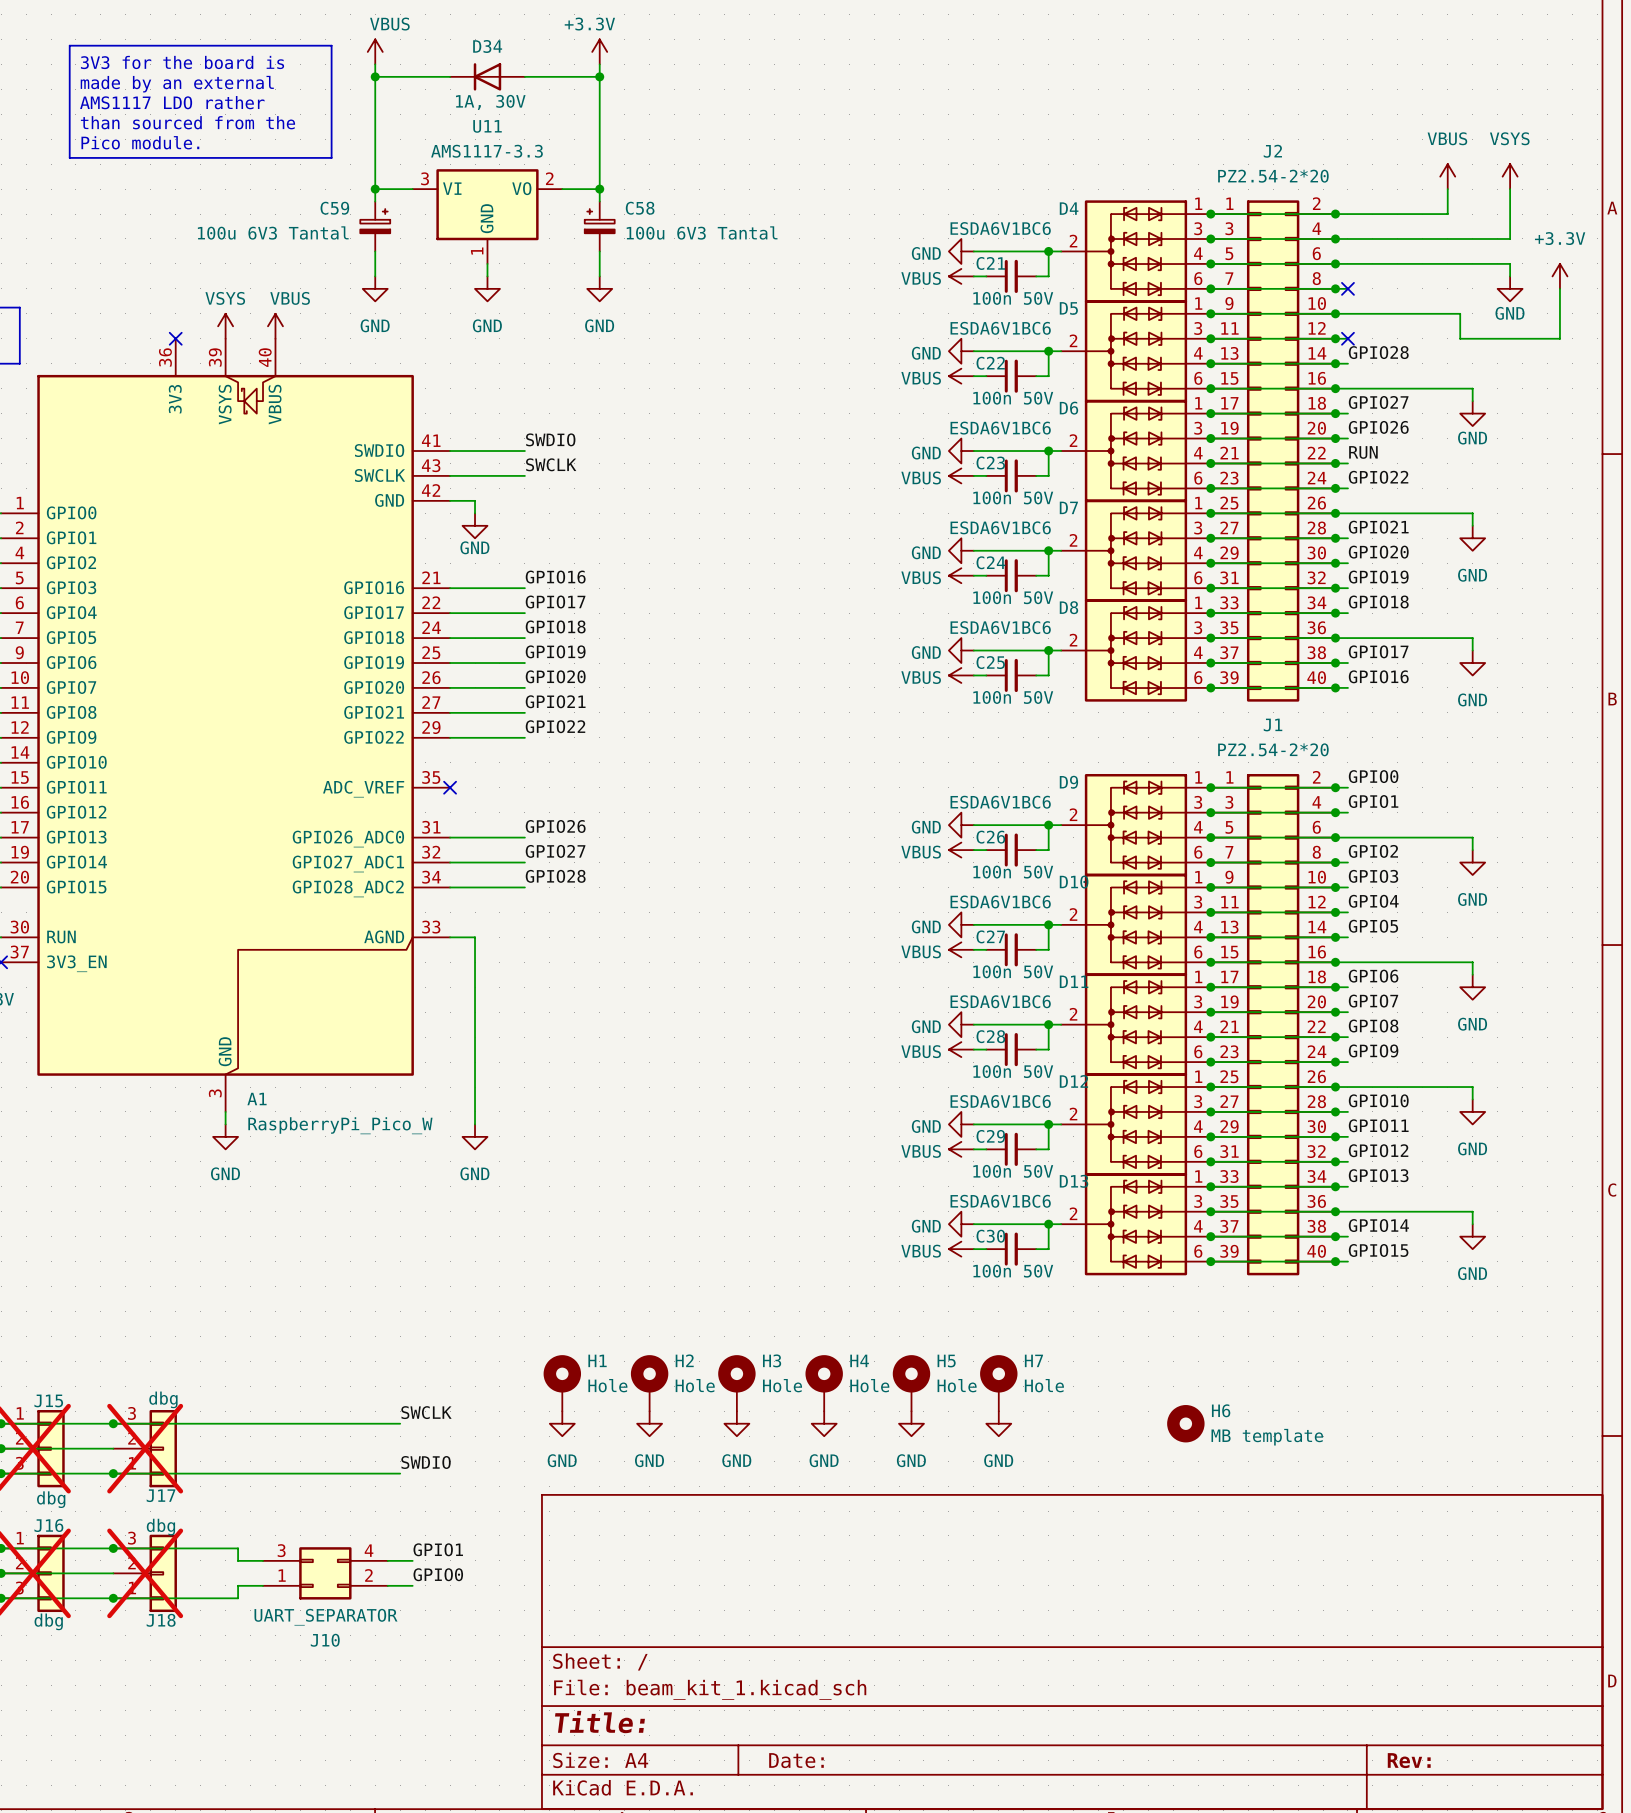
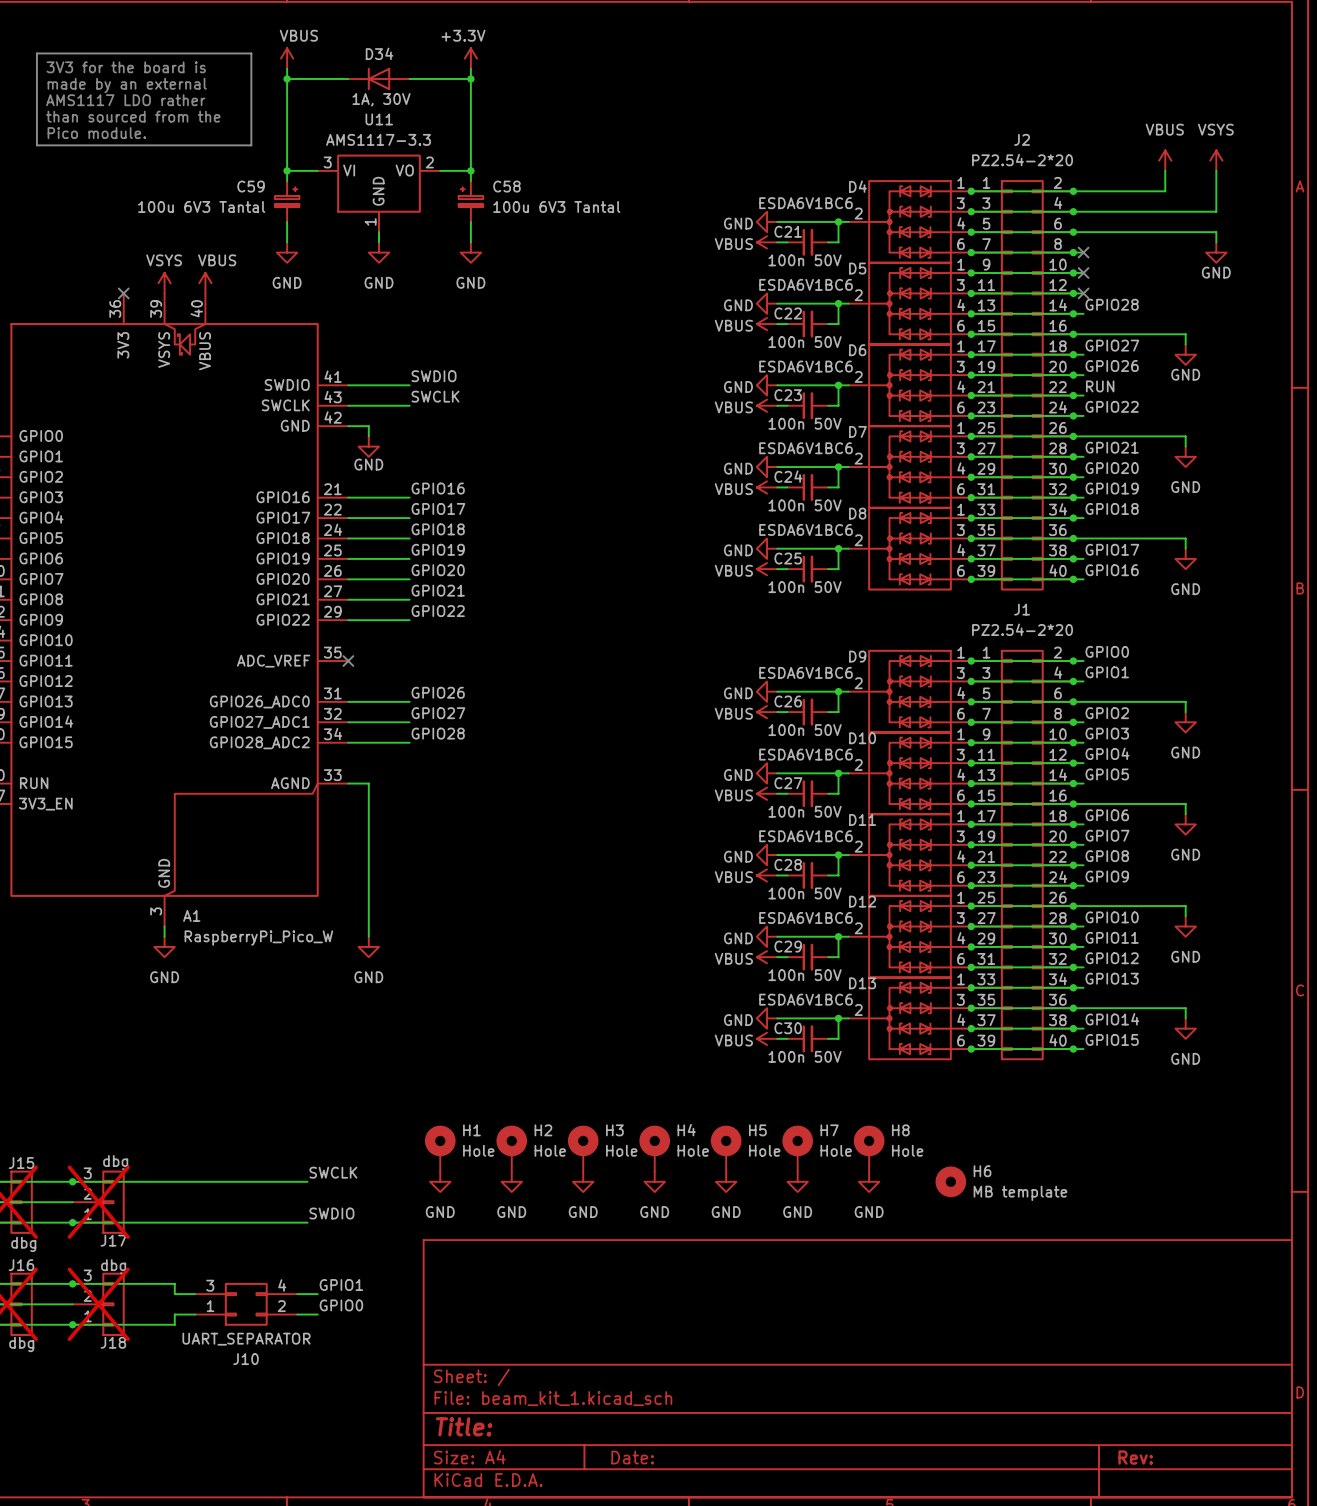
power symbol: +3.3V (1559, 276) -> none
wire: (1559, 288) (1559, 338) (1460, 338) (1460, 313) (1347, 313) -> none
no-connect mark: none -> (1083, 273)
H8: none -> Hole (869, 1148)
power symbol: none -> GND (869, 1181)

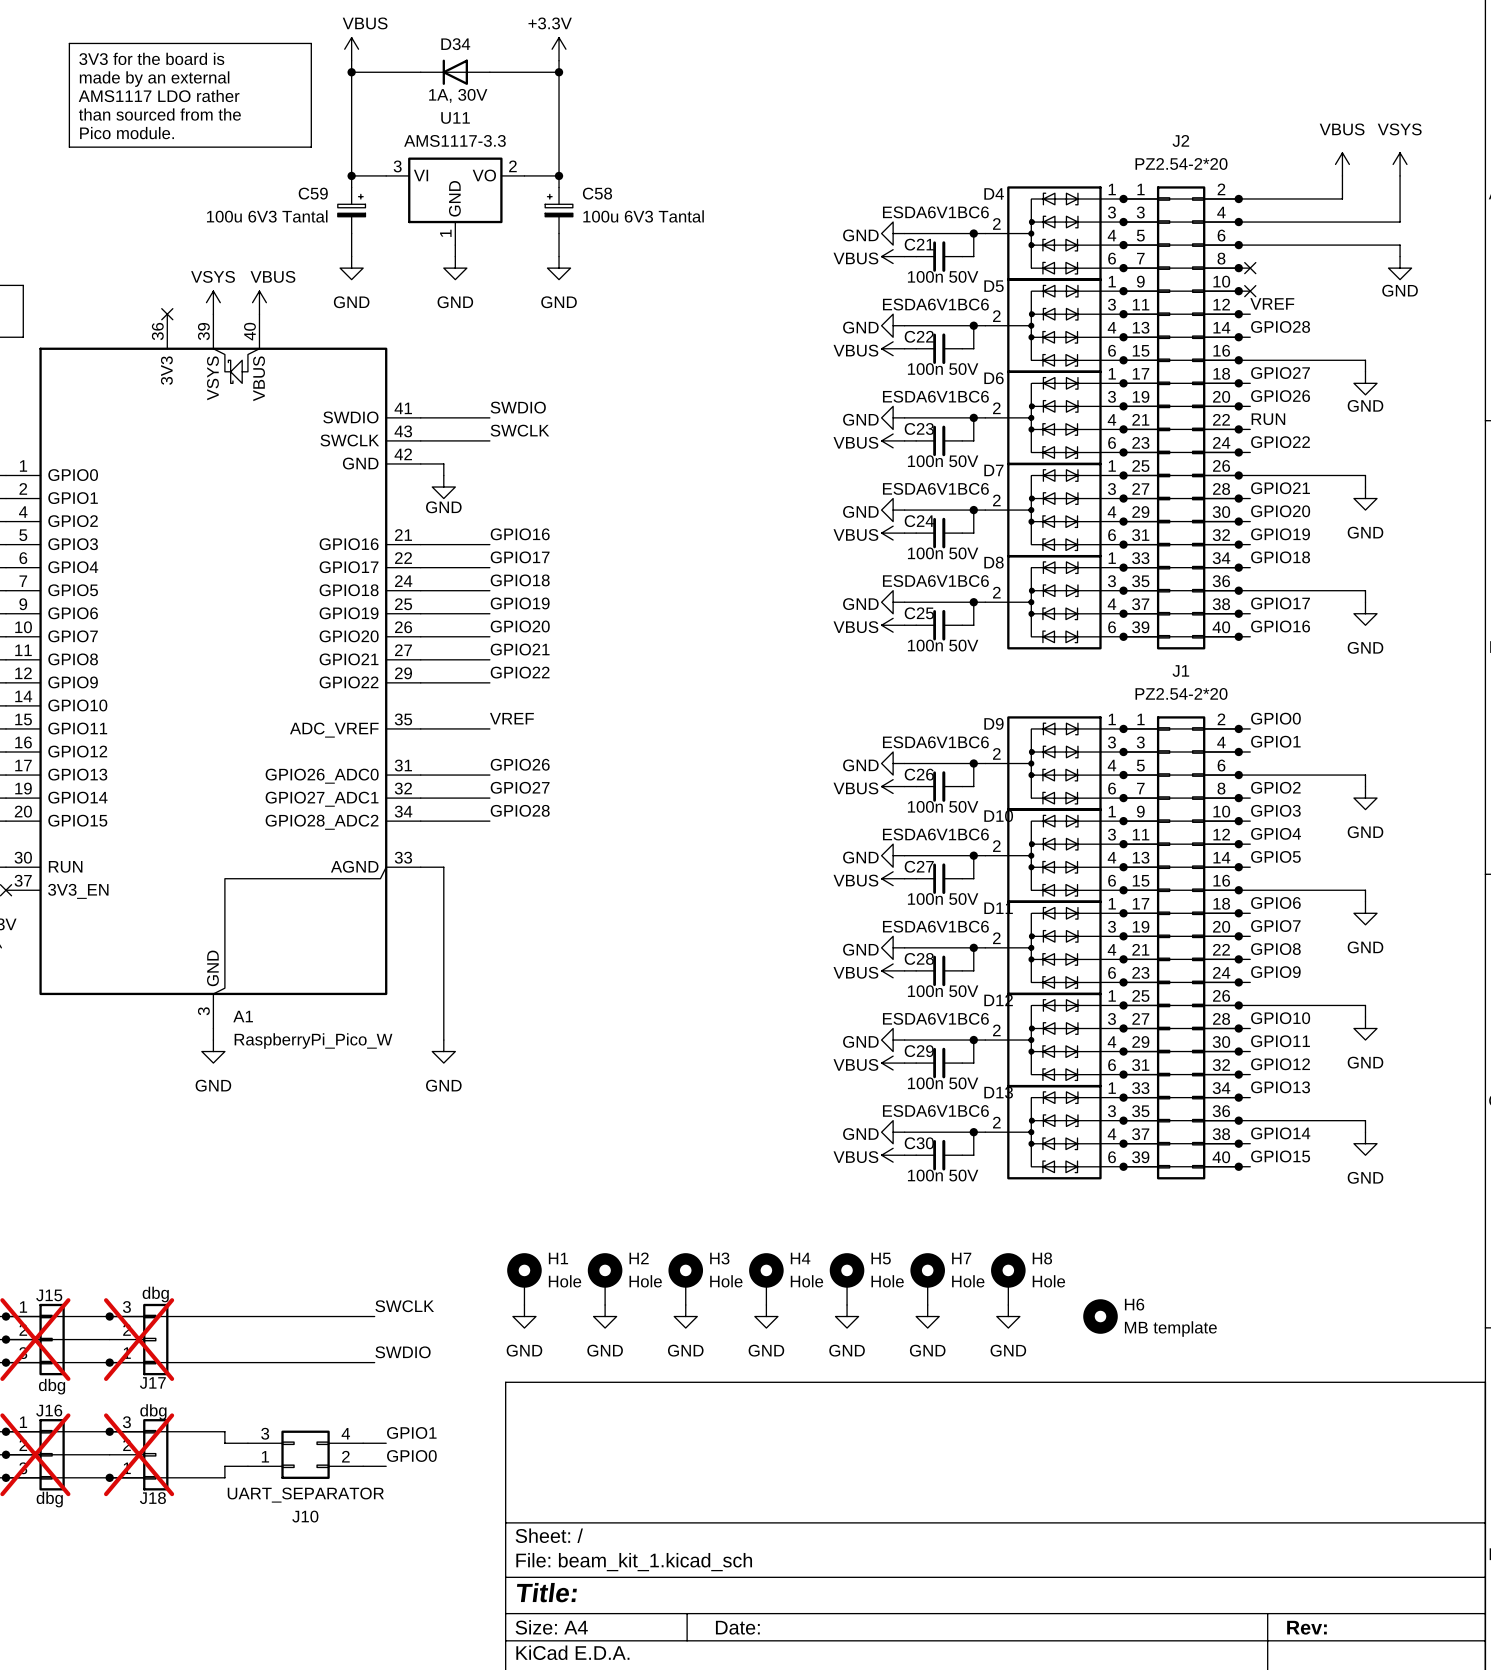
label: none -> VREF (1272, 303)
no-connect mark: (1083, 293) -> none
label: none -> VREF (511, 718)
wire: none -> (420, 728) (489, 728)
no-connect mark: (348, 661) -> none

